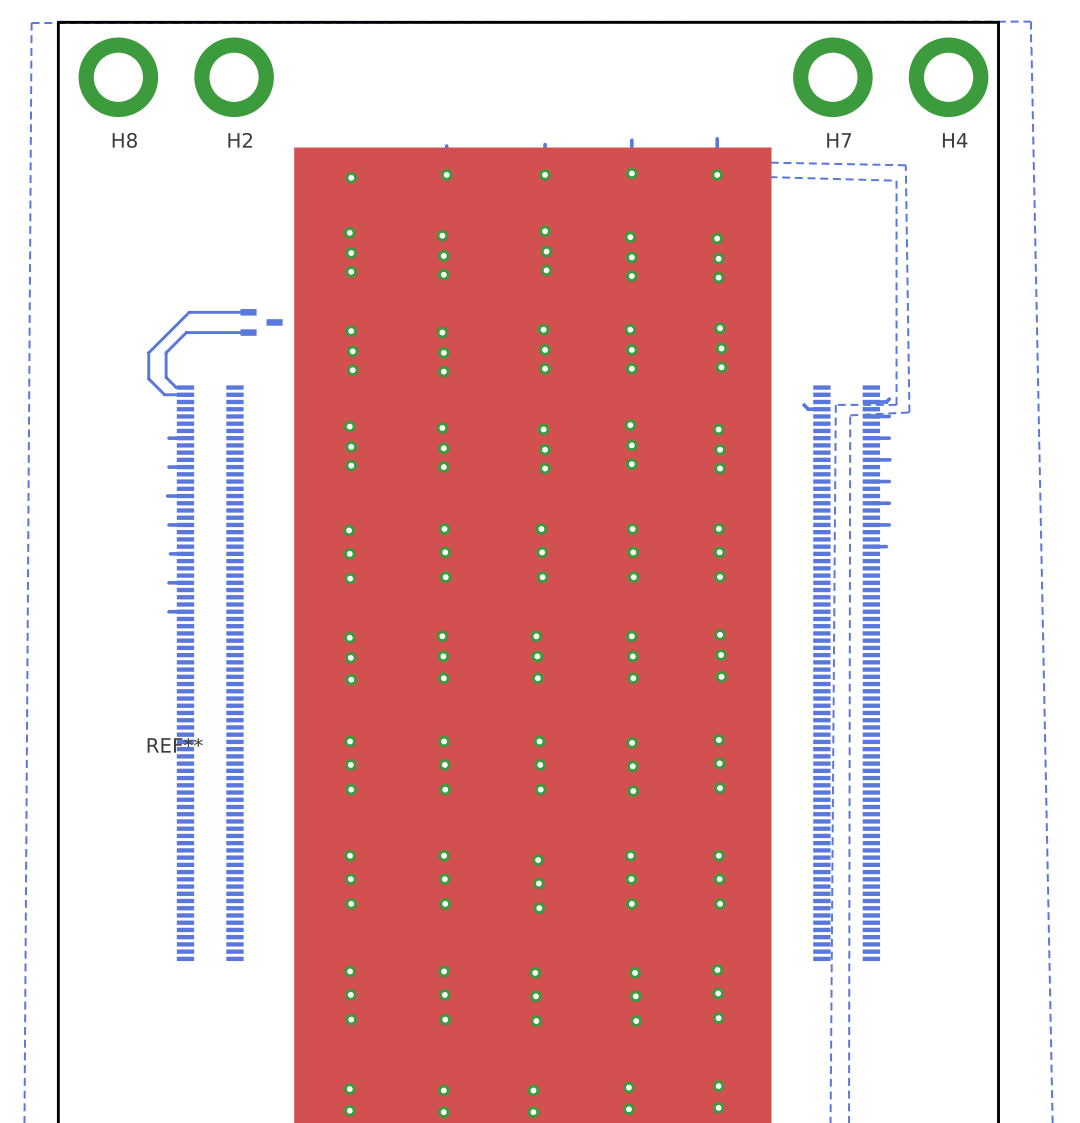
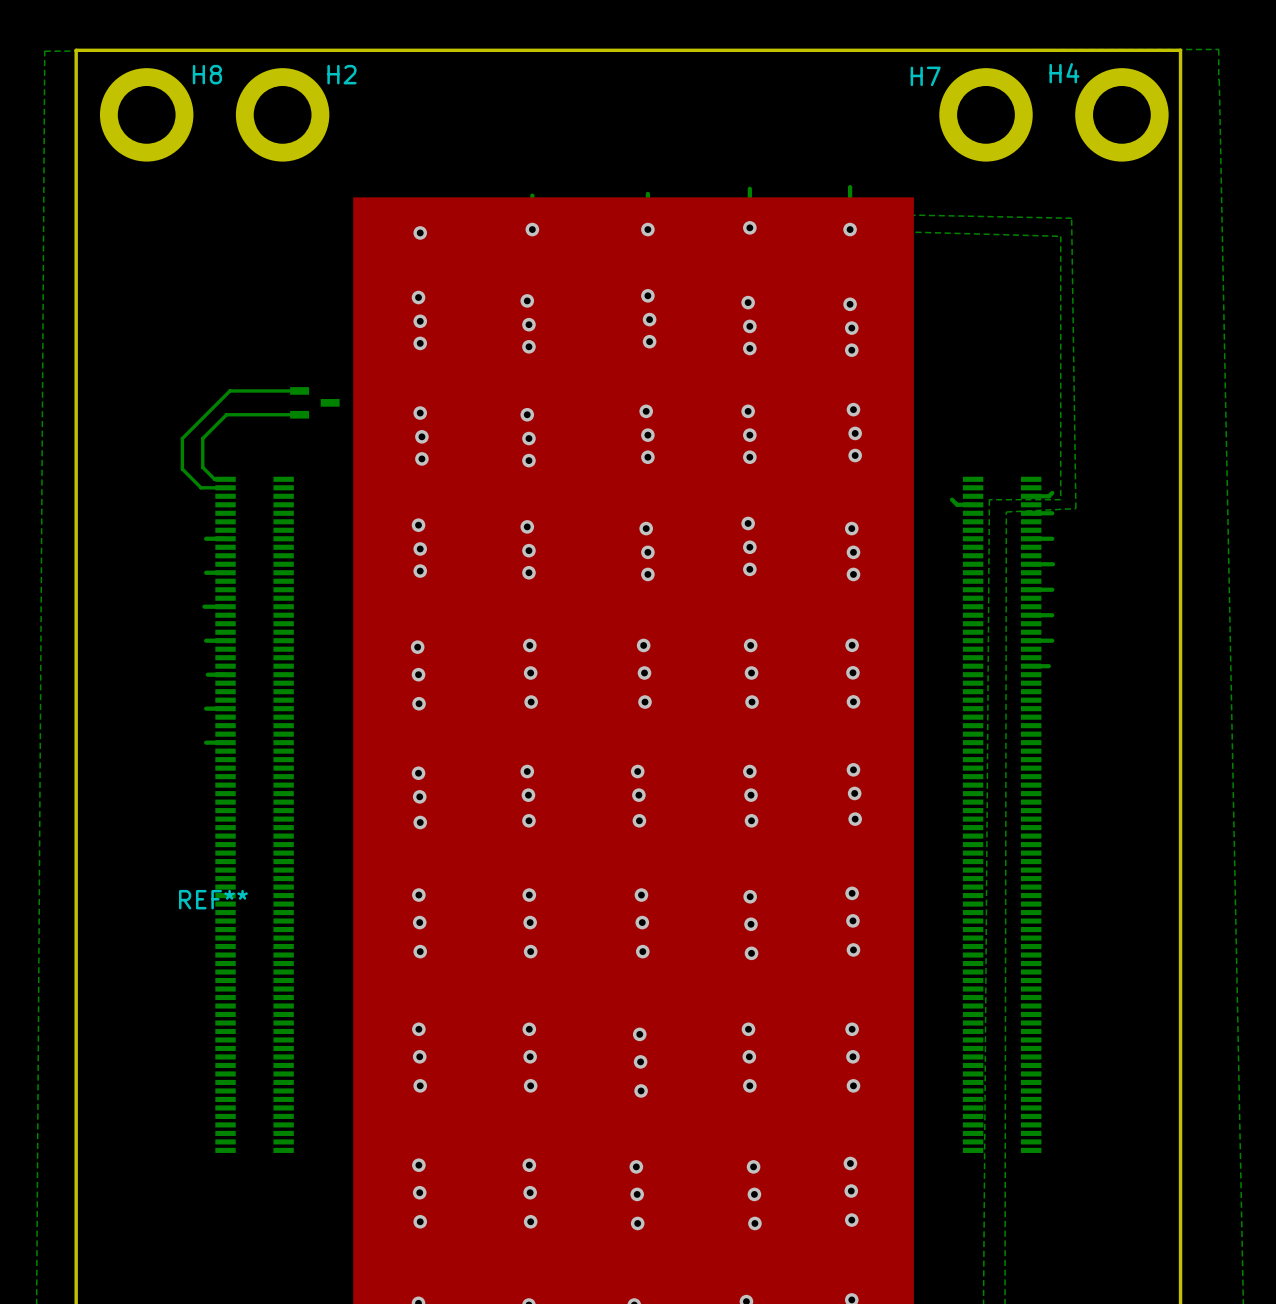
H8 name position: H8 (124, 140) -> H8 (207, 74)
H2 name position: H2 (240, 140) -> H2 (341, 74)
H7 name position: H7 (839, 140) -> H7 (925, 76)
H4 name position: H4 (955, 140) -> H4 (1064, 73)

